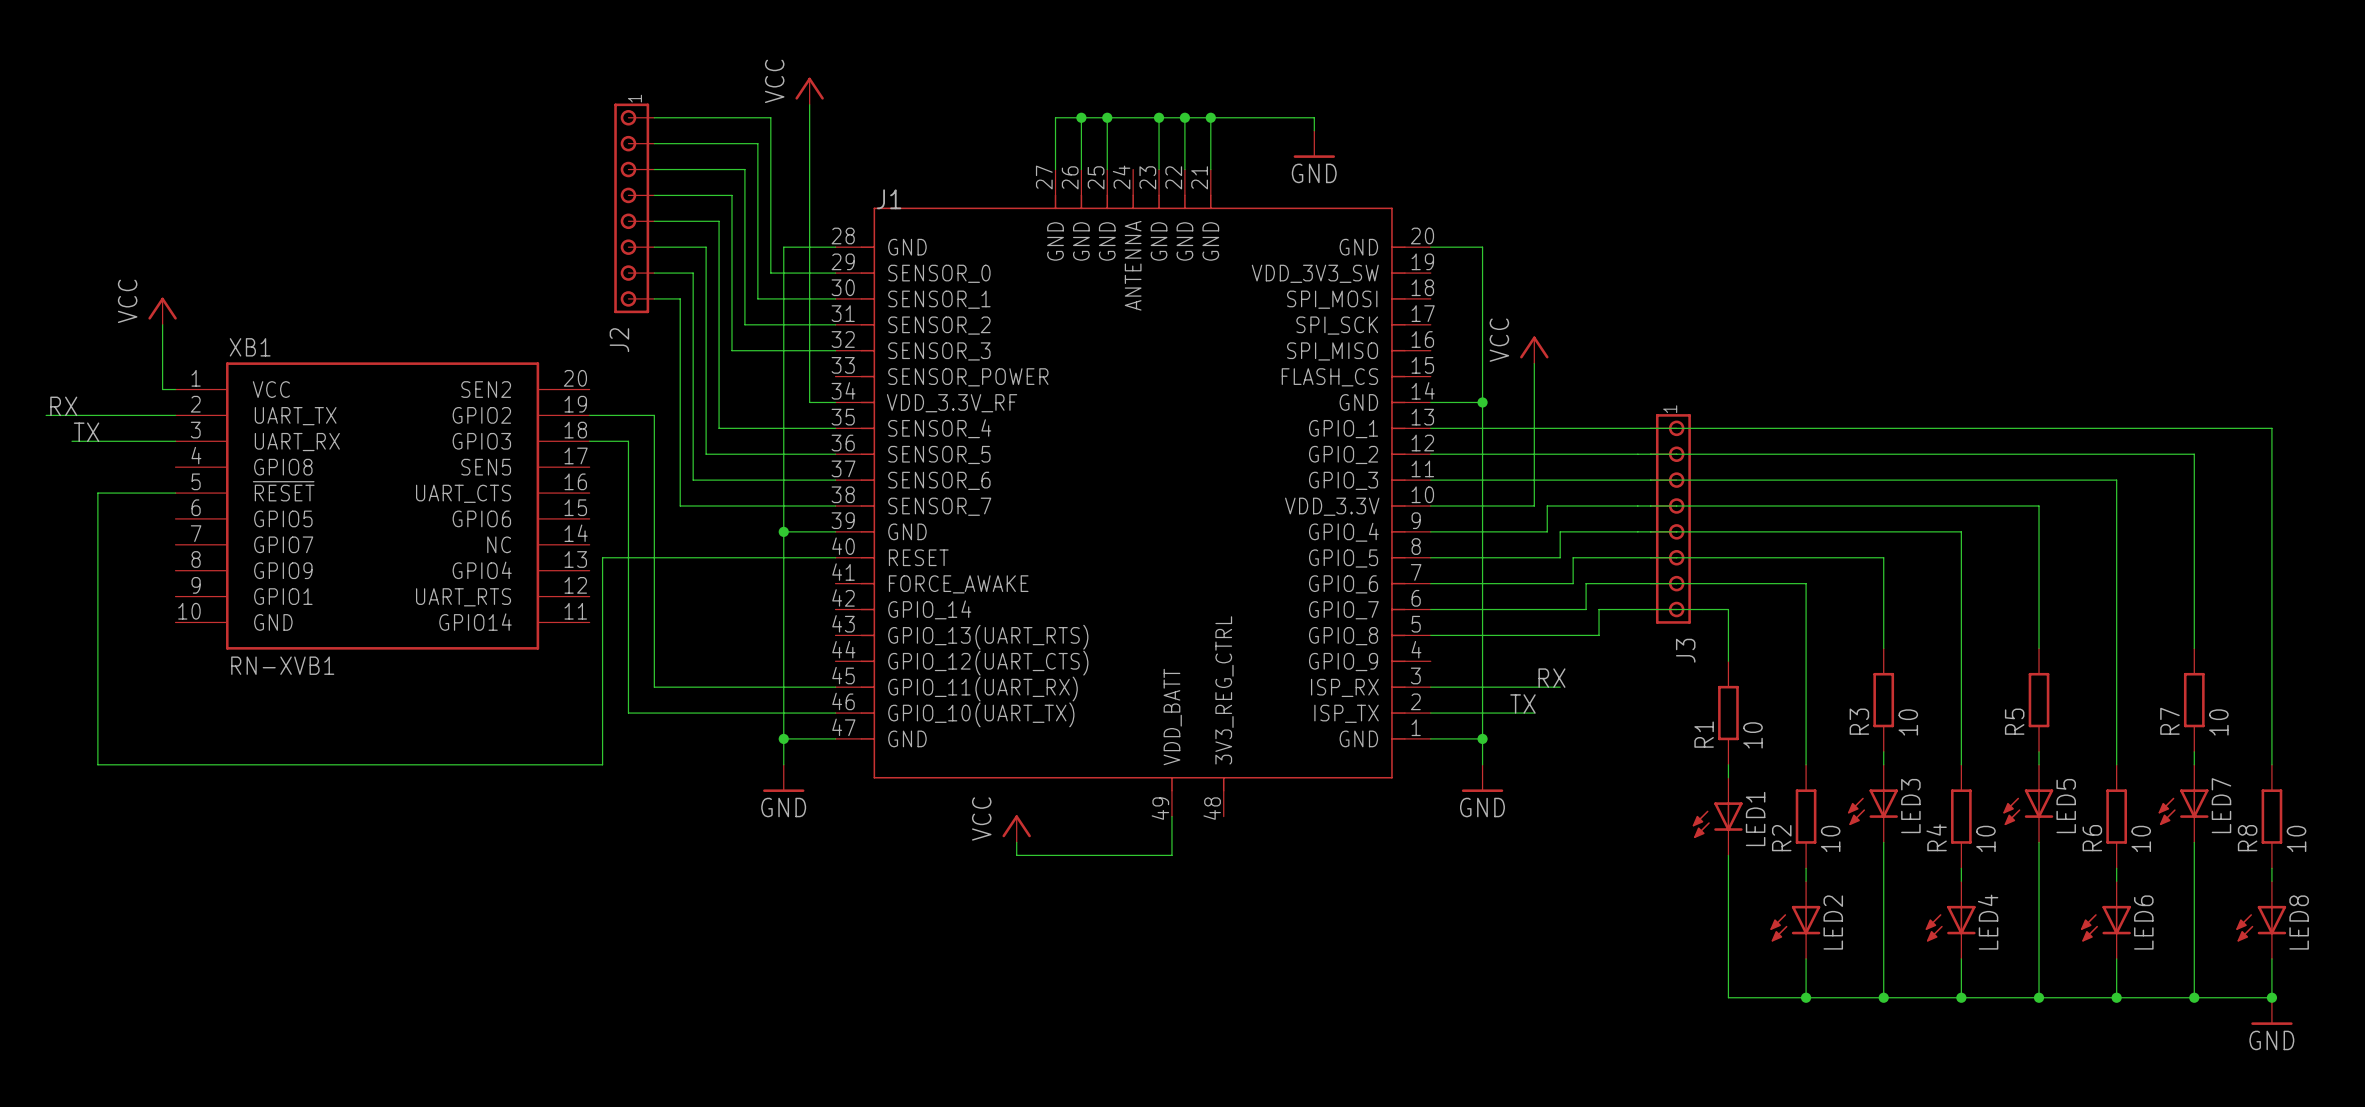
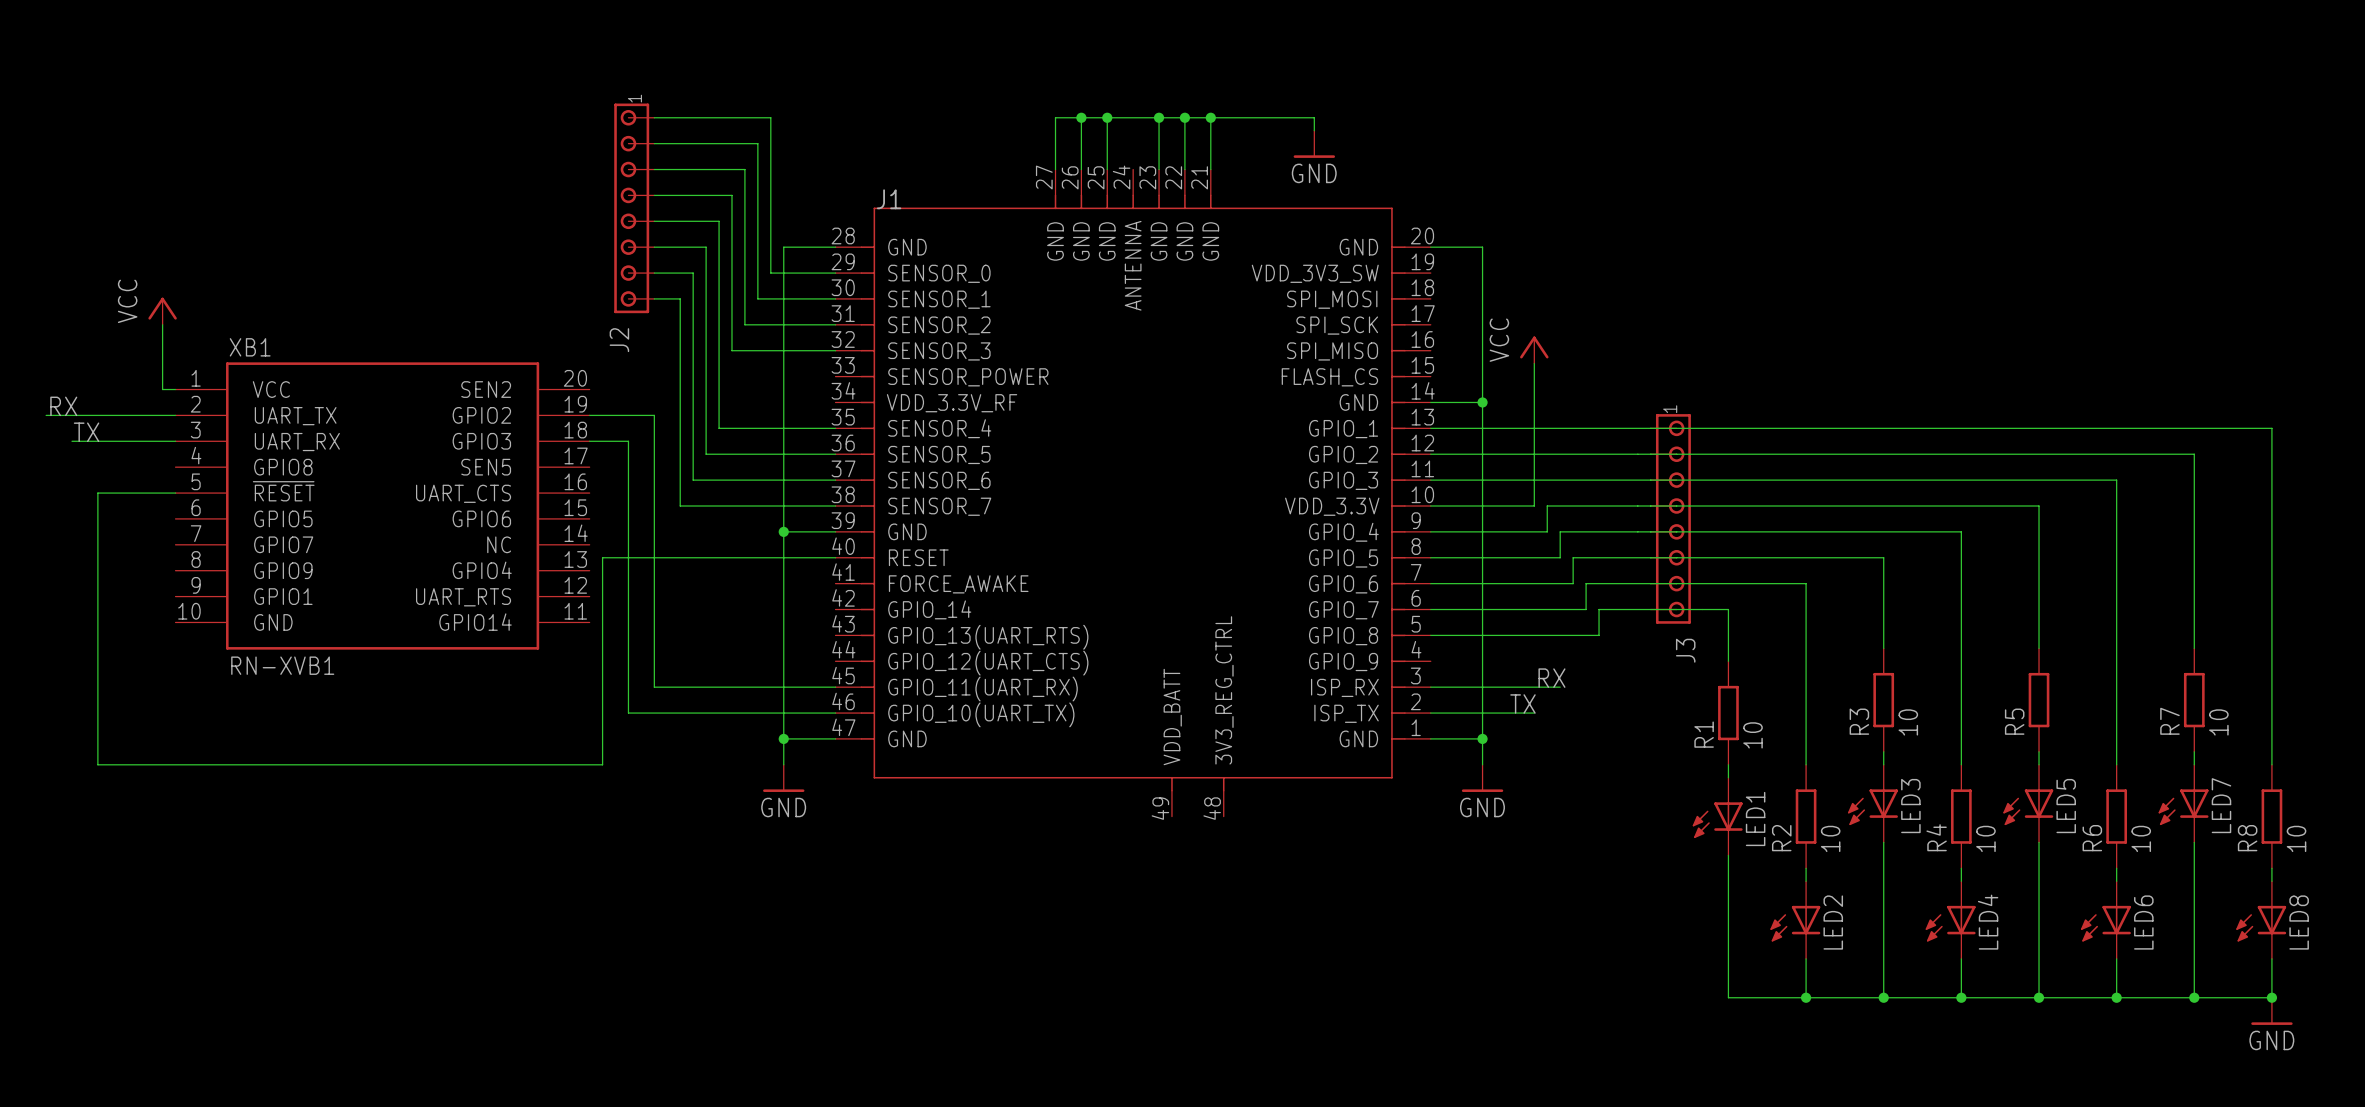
power symbol: VCC (809, 91) -> none
wire: (809, 104) (809, 402) (835, 402) -> none
wire: (1171, 816) (1171, 855) (1016, 855) (1016, 842) -> none
power symbol: VCC (1016, 828) -> none

